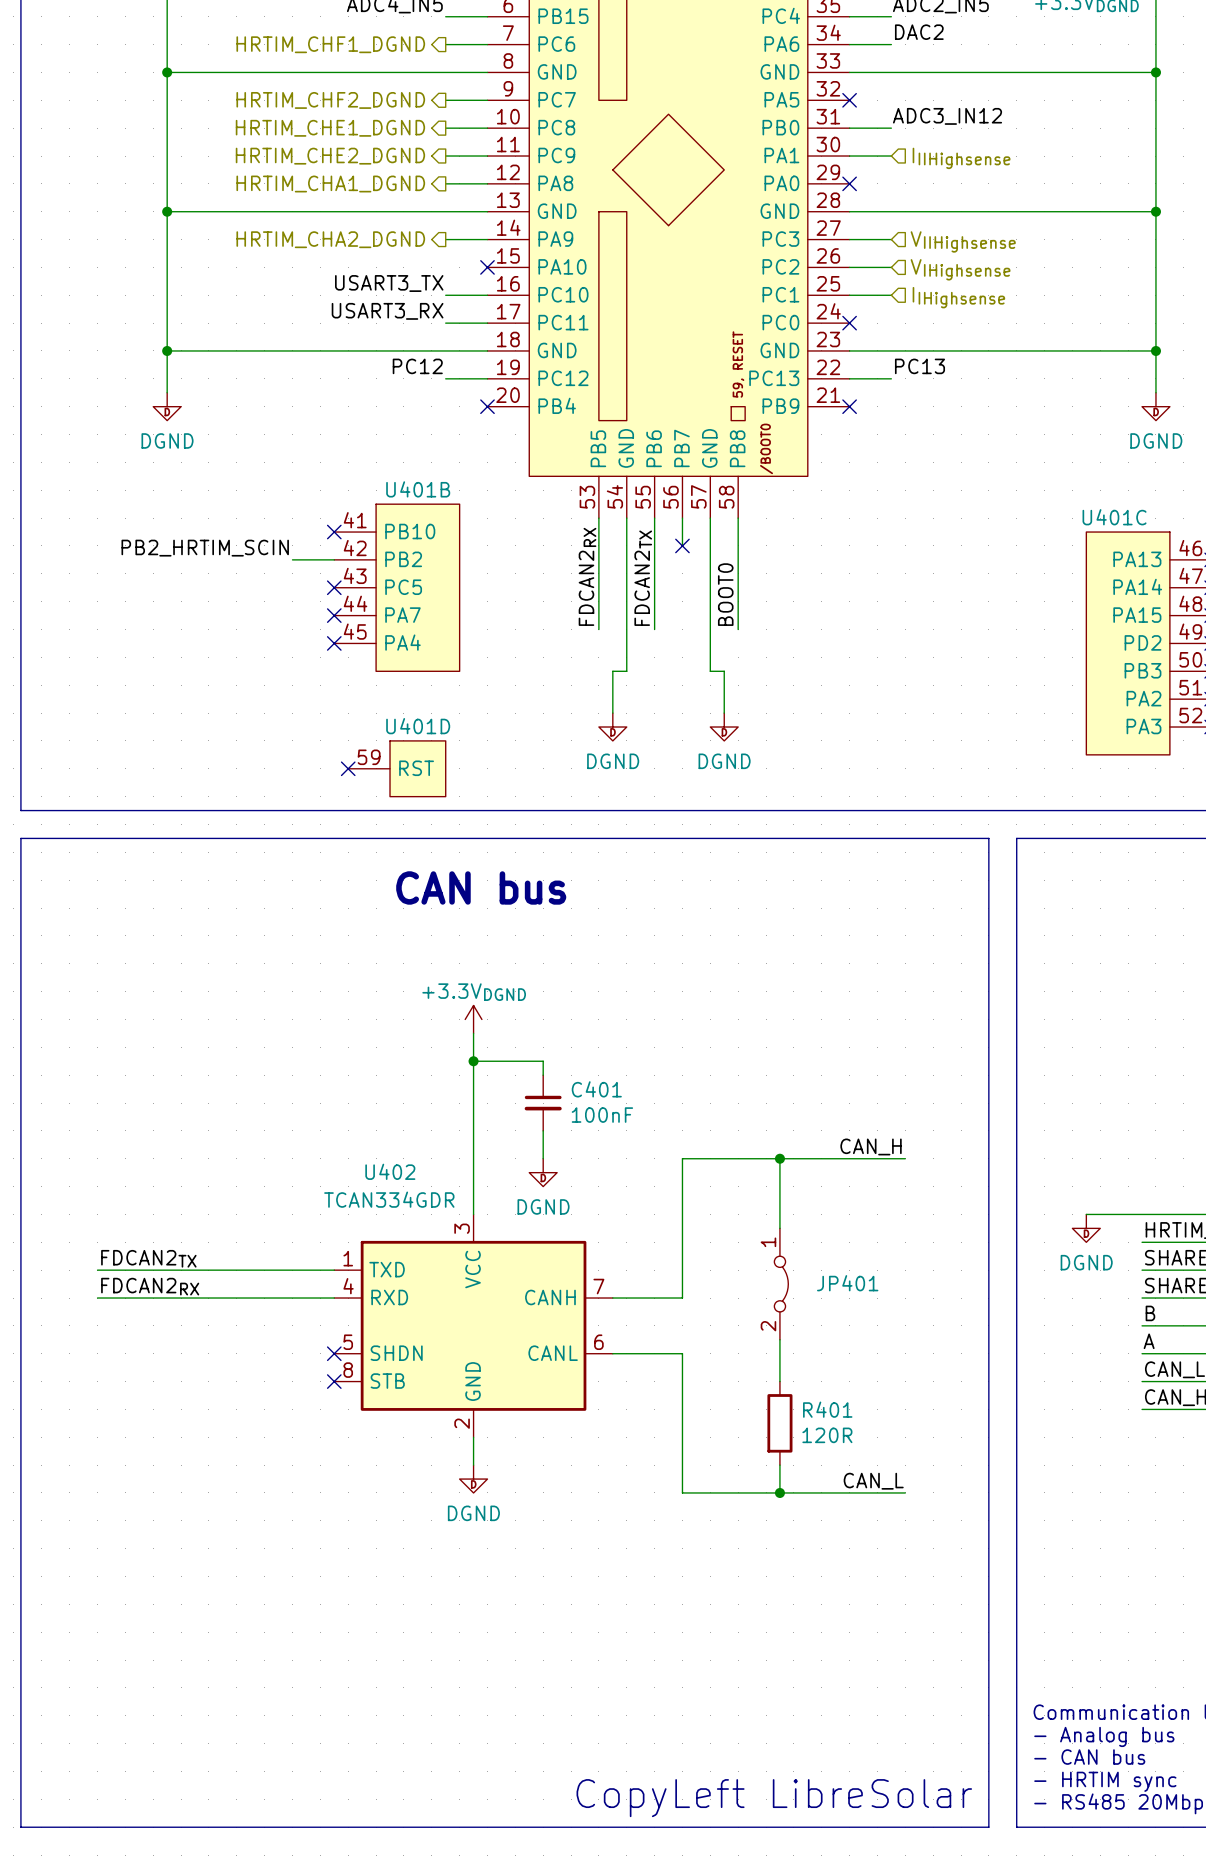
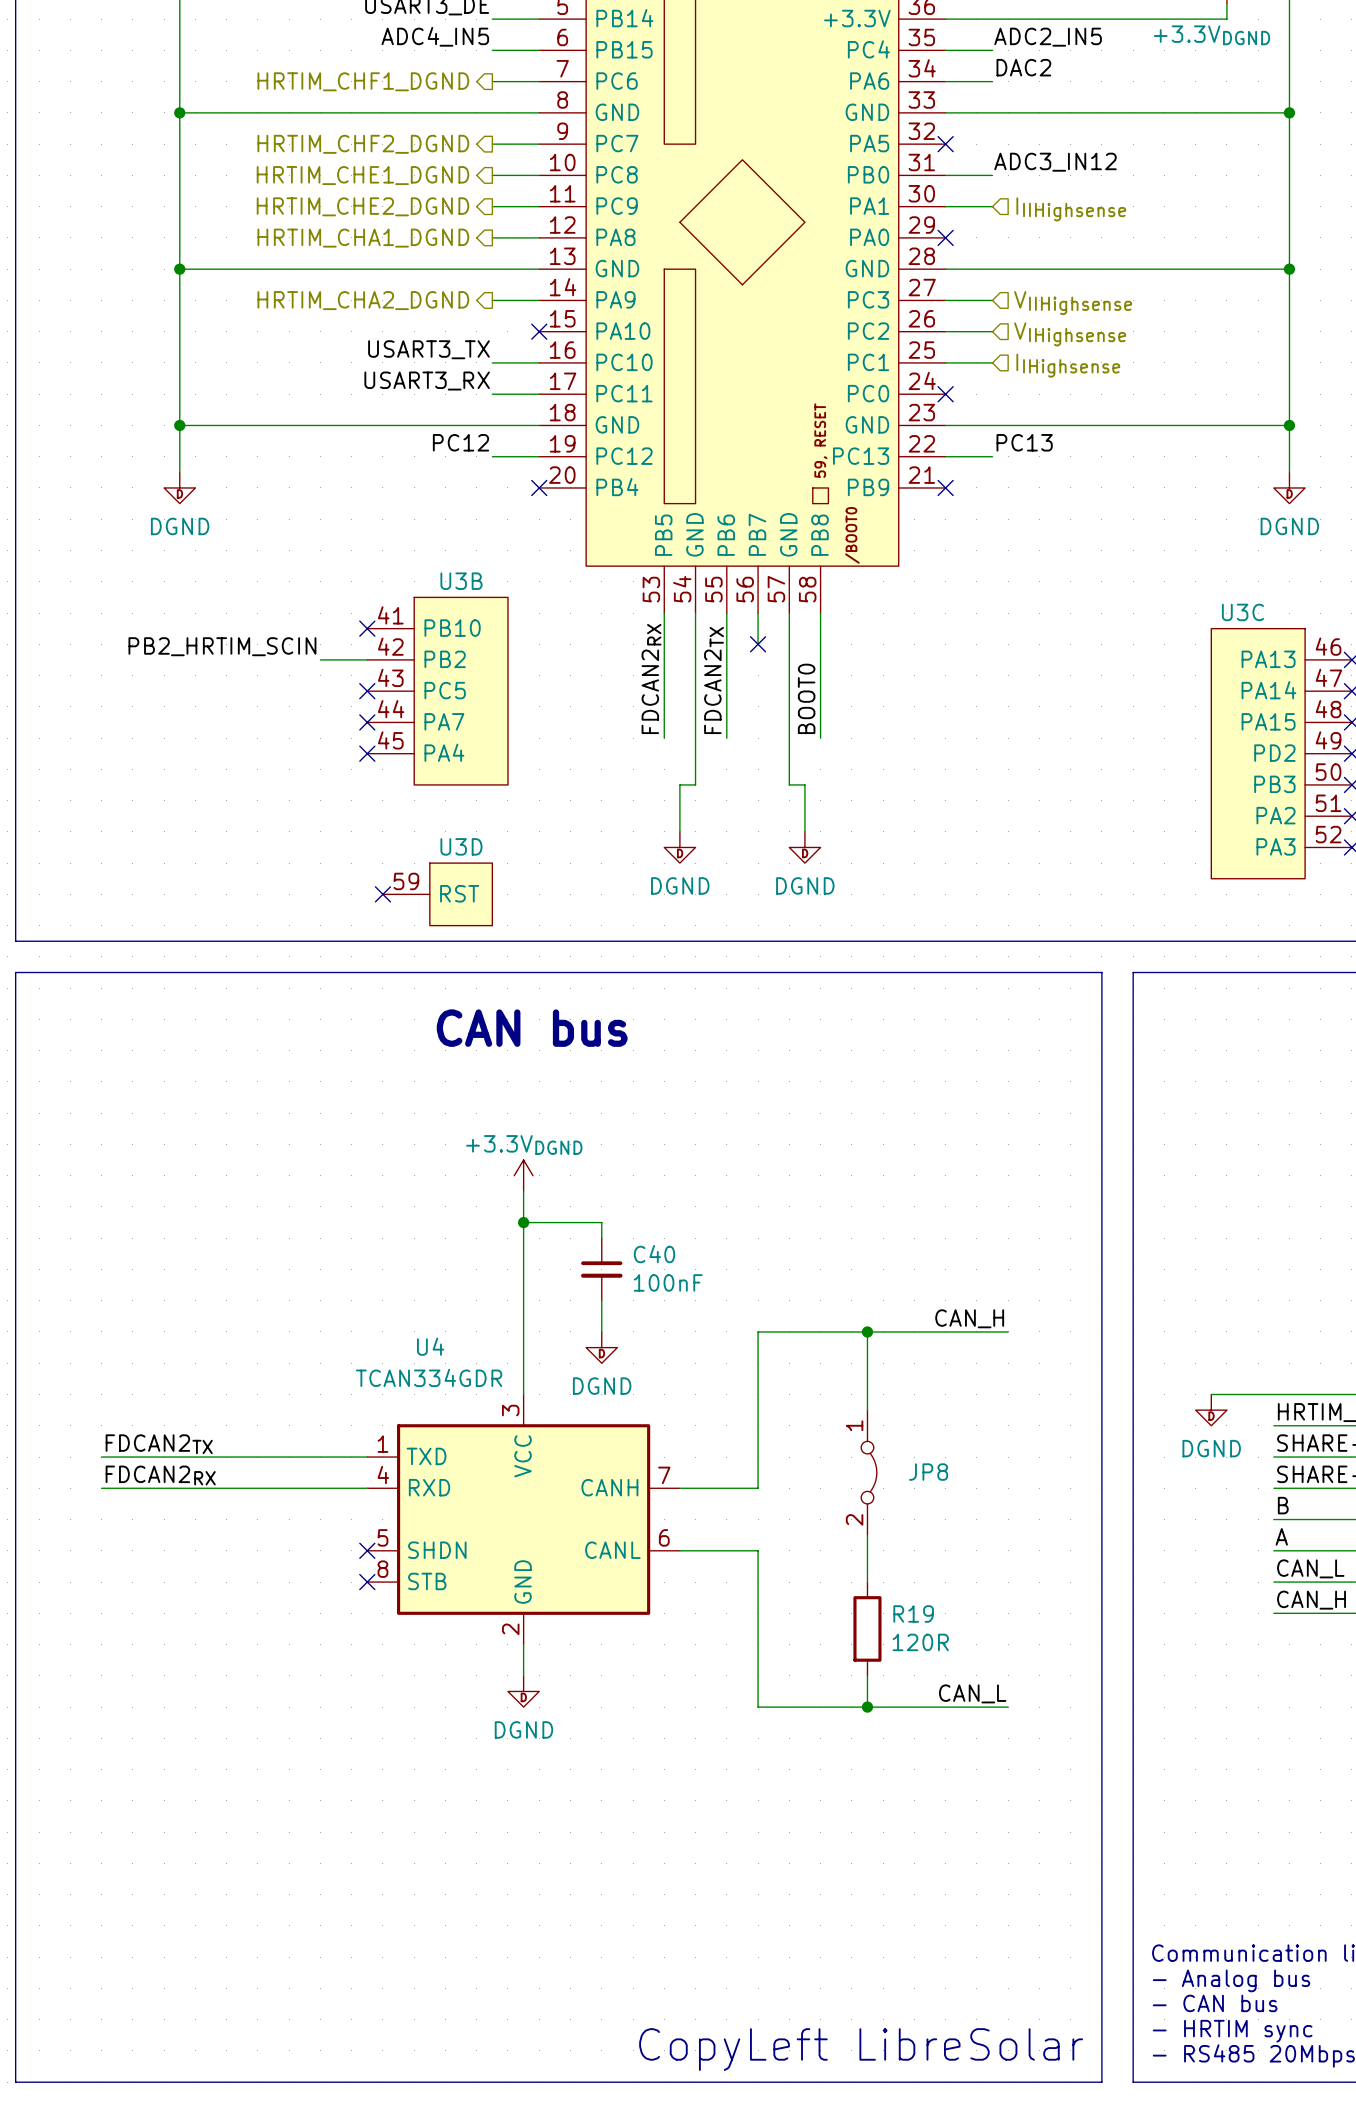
U401B name: U401B (418, 489) -> U3B (461, 581)
U401C name: U401C (1114, 517) -> U3C (1242, 612)
U401D name: U401D (418, 726) -> U3D (461, 846)
C401 name: C401 (596, 1089) -> C40 (654, 1254)
U402 name: U402 (390, 1171) -> U4 (430, 1346)
JP401 name: JP401 (847, 1283) -> JP8 (928, 1472)
R401 name: R401 (827, 1409) -> R19 (913, 1613)

